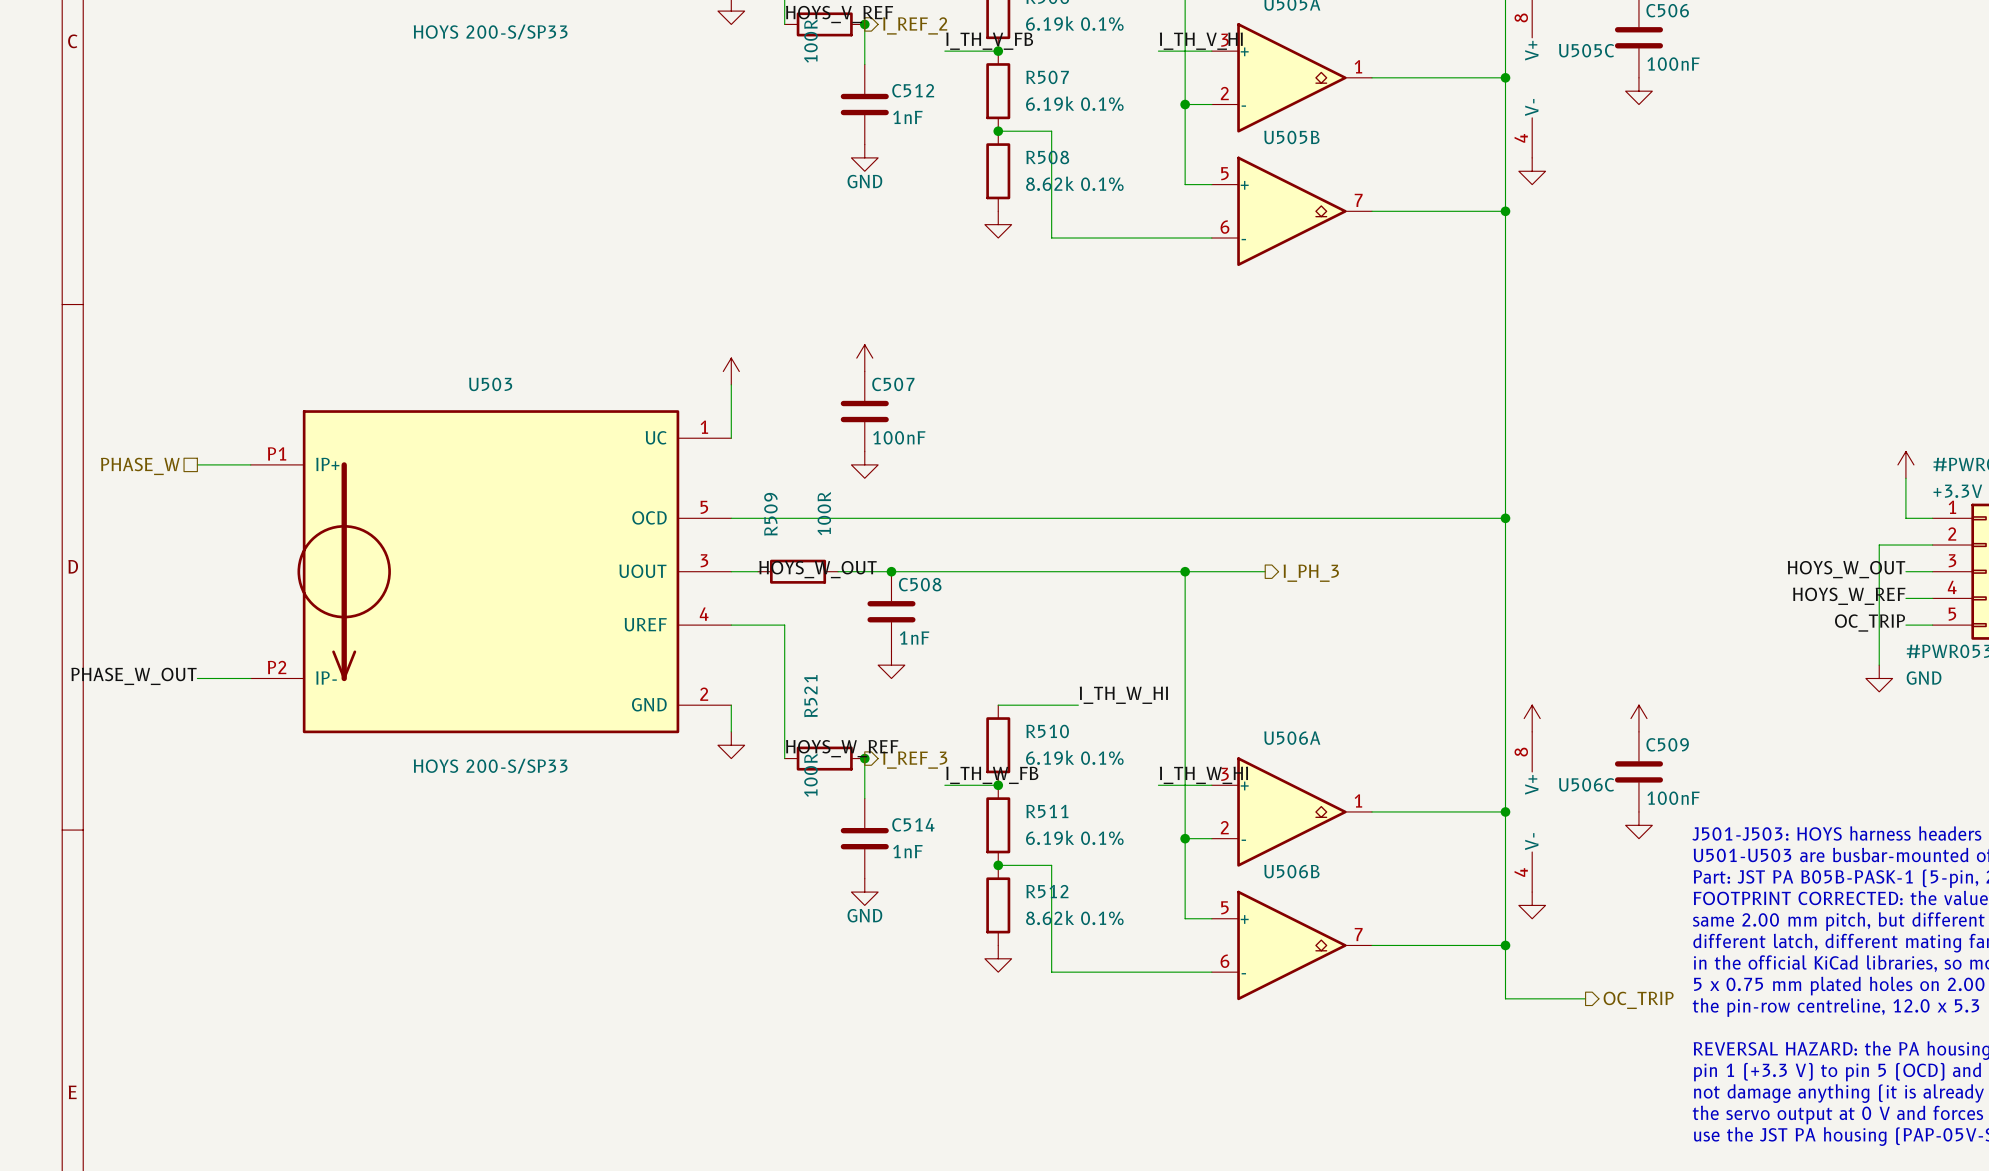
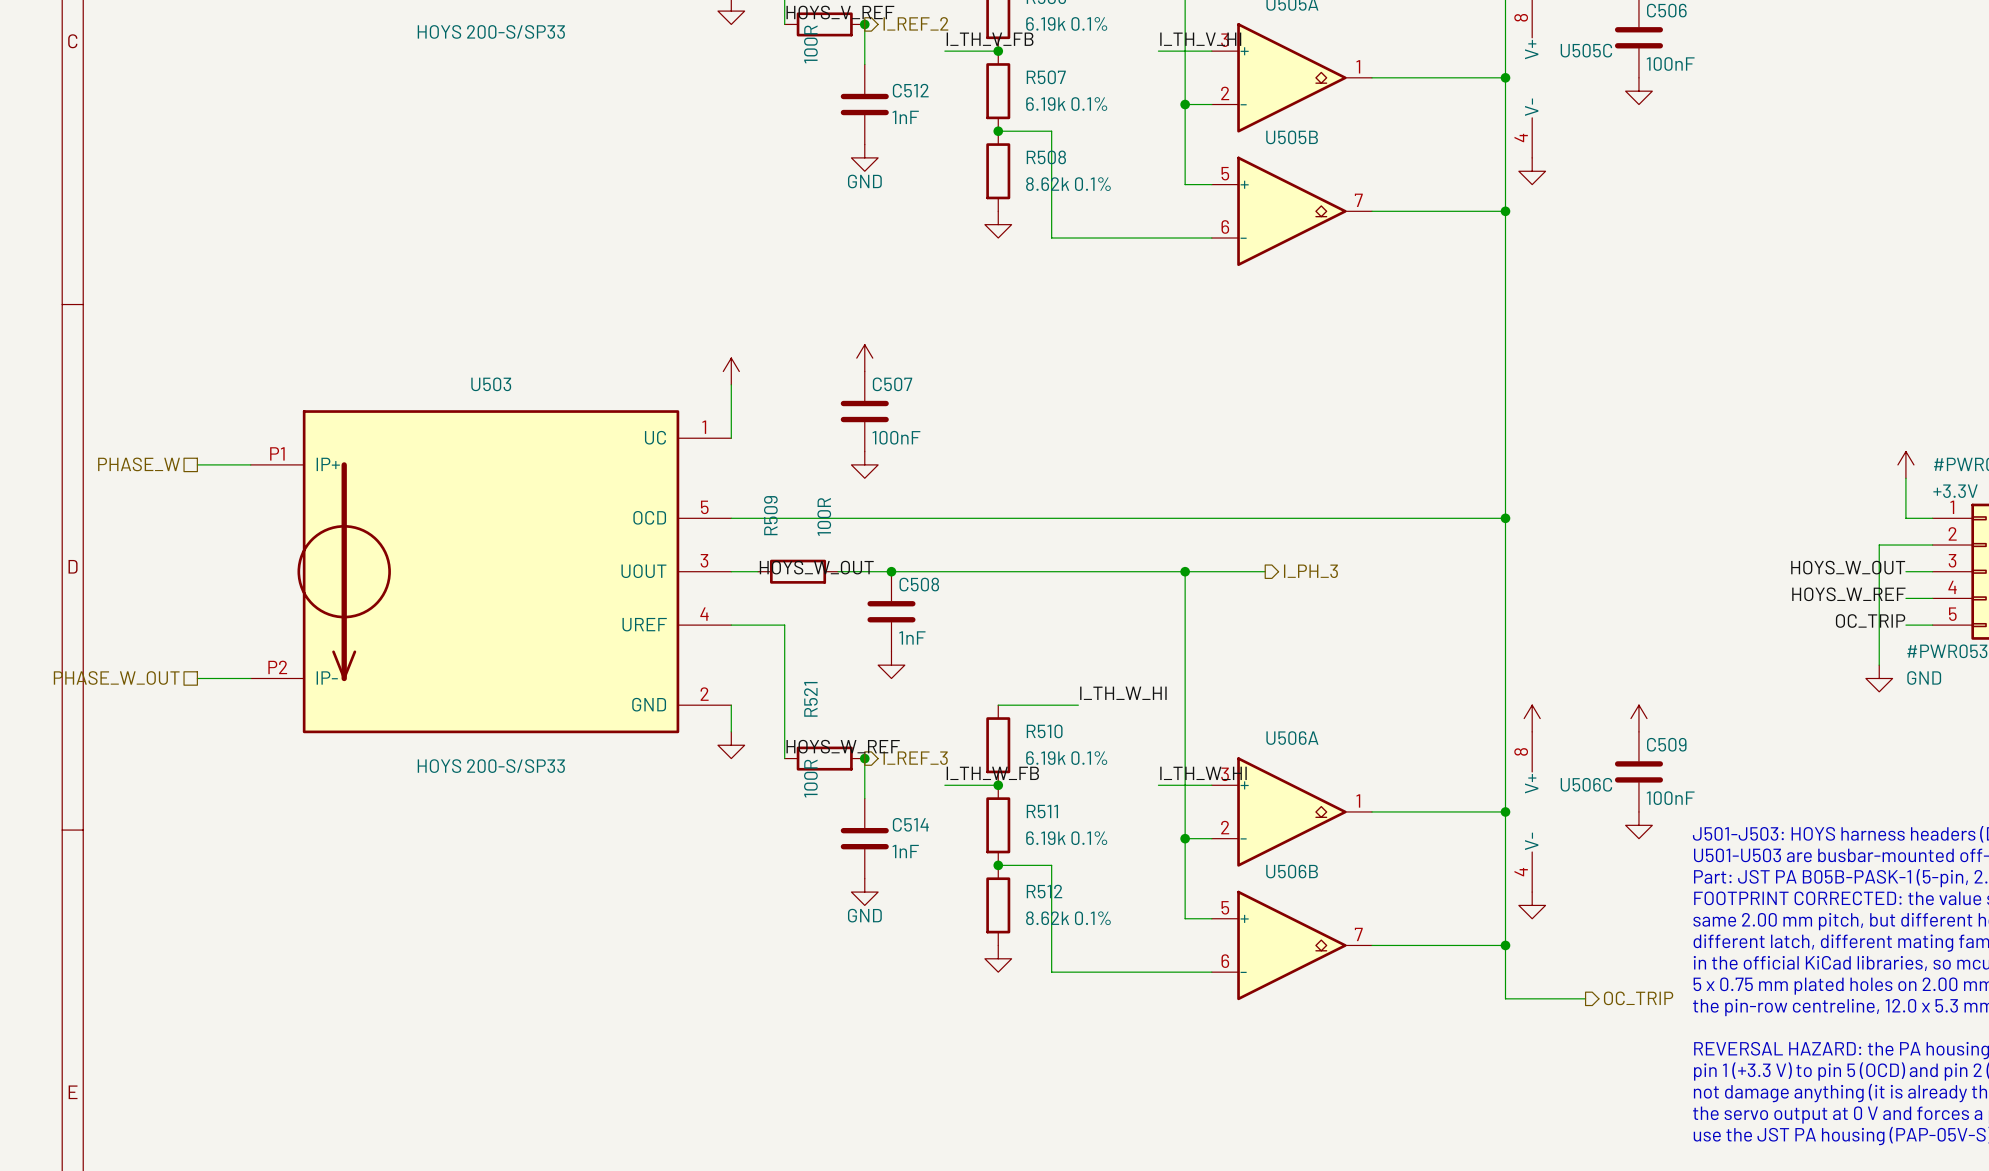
label: PHASE_W_OUT (134, 676) -> none
hierarchical label: none -> PHASE_W_OUT (116, 677)

